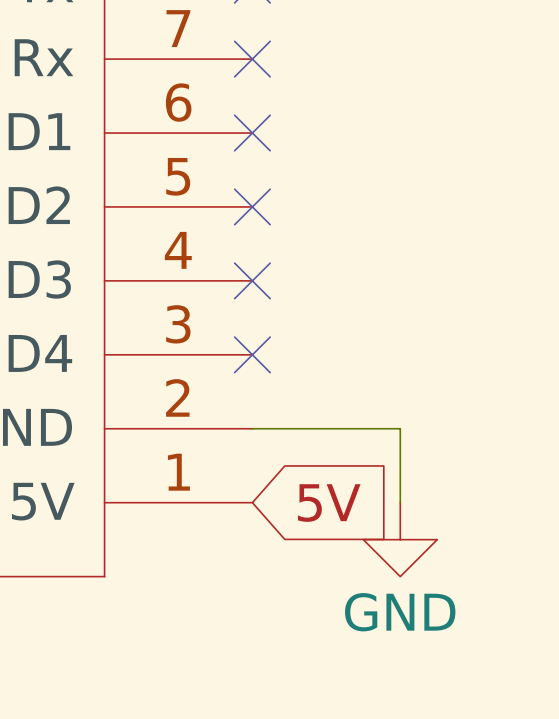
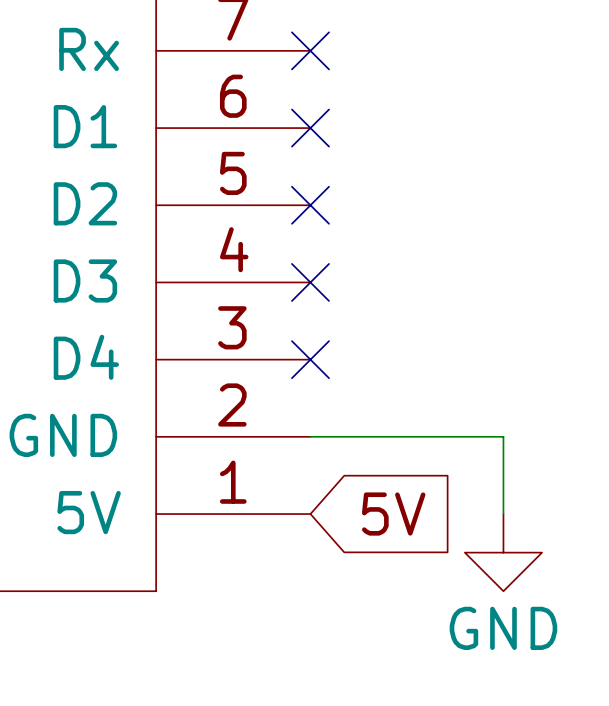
wire: (400, 428) (400, 502) -> (464, 436) (503, 436) (503, 514)
power symbol position: GND (400, 539) -> GND (503, 552)

